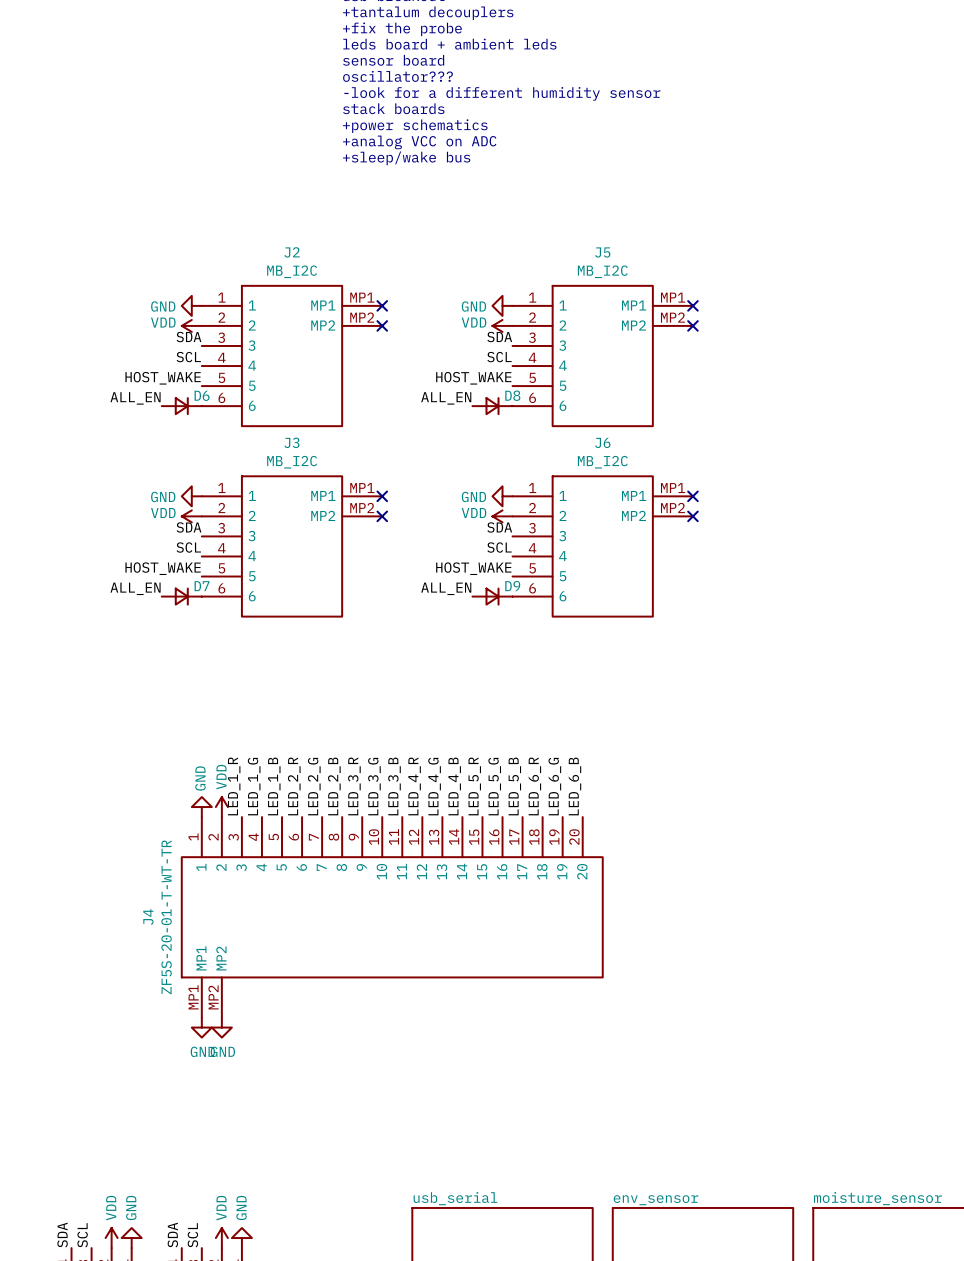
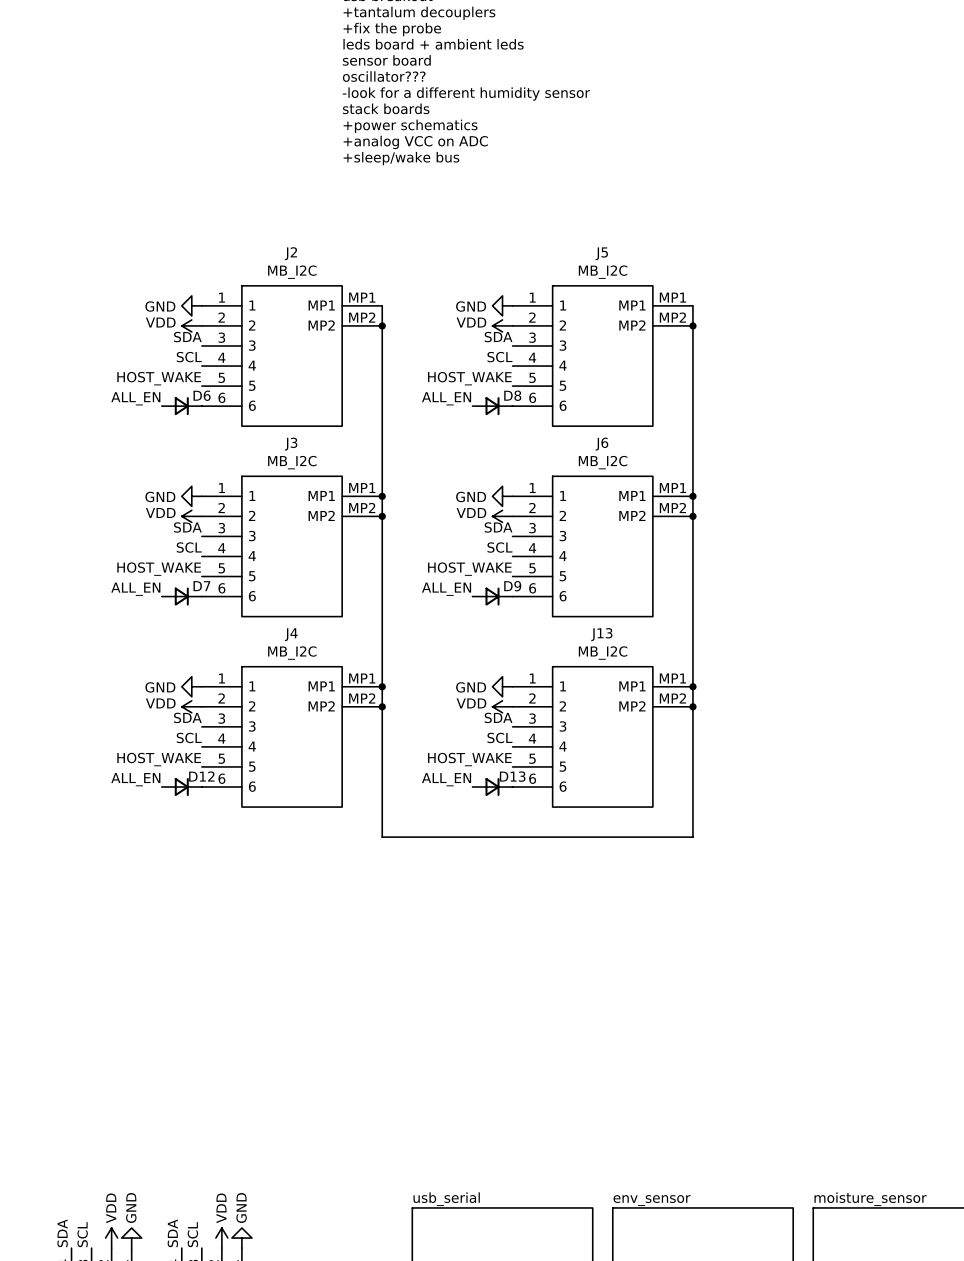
wire: none -> (382, 305) (382, 837) (692, 837) (692, 305)
no-connect mark: (382, 305) -> none
no-connect mark: (692, 305) -> none
no-connect mark: (382, 325) -> none
junction: none -> (382, 325)
no-connect mark: (692, 325) -> none
junction: none -> (692, 325)
no-connect mark: (382, 496) -> none
junction: none -> (382, 496)
no-connect mark: (692, 496) -> none
junction: none -> (692, 496)
no-connect mark: (382, 516) -> none
junction: none -> (382, 516)
no-connect mark: (692, 516) -> none
junction: none -> (692, 516)
junction: none -> (382, 686)
power symbol: none -> GND (502, 686)
junction: none -> (692, 686)
junction: none -> (382, 706)
power symbol: none -> VDD (502, 706)
junction: none -> (692, 706)
label: none -> SDA (187, 717)
label: none -> SDA (498, 717)
J13: none -> MB_I2C (602, 736)
label: none -> SCL (189, 737)
label: none -> SCL (499, 737)
label: none -> HOST_WAKE (159, 759)
label: none -> HOST_WAKE (469, 759)
label: none -> ALL_EN (135, 779)
label: none -> ALL_EN (446, 779)
label: LED_1_R (234, 786) -> none
label: LED_1_G (254, 786) -> none
label: LED_1_B (274, 786) -> none
label: LED_2_R (294, 786) -> none
label: LED_2_G (314, 786) -> none
label: LED_2_B (334, 786) -> none
label: LED_3_R (354, 786) -> none
label: LED_3_G (374, 786) -> none
label: LED_3_B (394, 786) -> none
label: LED_4_R (414, 786) -> none
label: LED_4_G (434, 786) -> none
label: LED_4_B (454, 786) -> none
label: LED_5_R (474, 786) -> none
label: LED_5_G (494, 786) -> none
label: LED_5_B (514, 786) -> none
label: LED_6_R (534, 786) -> none
label: LED_6_G (554, 786) -> none
label: LED_6_B (574, 786) -> none
D12: none -> (181, 787)
D13: none -> (492, 787)
power symbol rotation: 0° (201, 807) -> 90° counterclockwise (191, 686)
power symbol position: GND (201, 807) -> GND (191, 686)
power symbol rotation: 0° (221, 807) -> 90° counterclockwise (191, 706)
power symbol position: VDD (221, 807) -> VDD (191, 706)
J4 symbol: [181, 817, 604, 1018] -> [201, 666, 383, 808]
J4 name position: J4 (148, 917) -> J4 (291, 634)
J4 value: ZF5S-20-01-T-WT-TR (166, 917) -> MB_I2C (292, 653)
power symbol: GND (201, 1027) -> none
power symbol: GND (221, 1027) -> none

